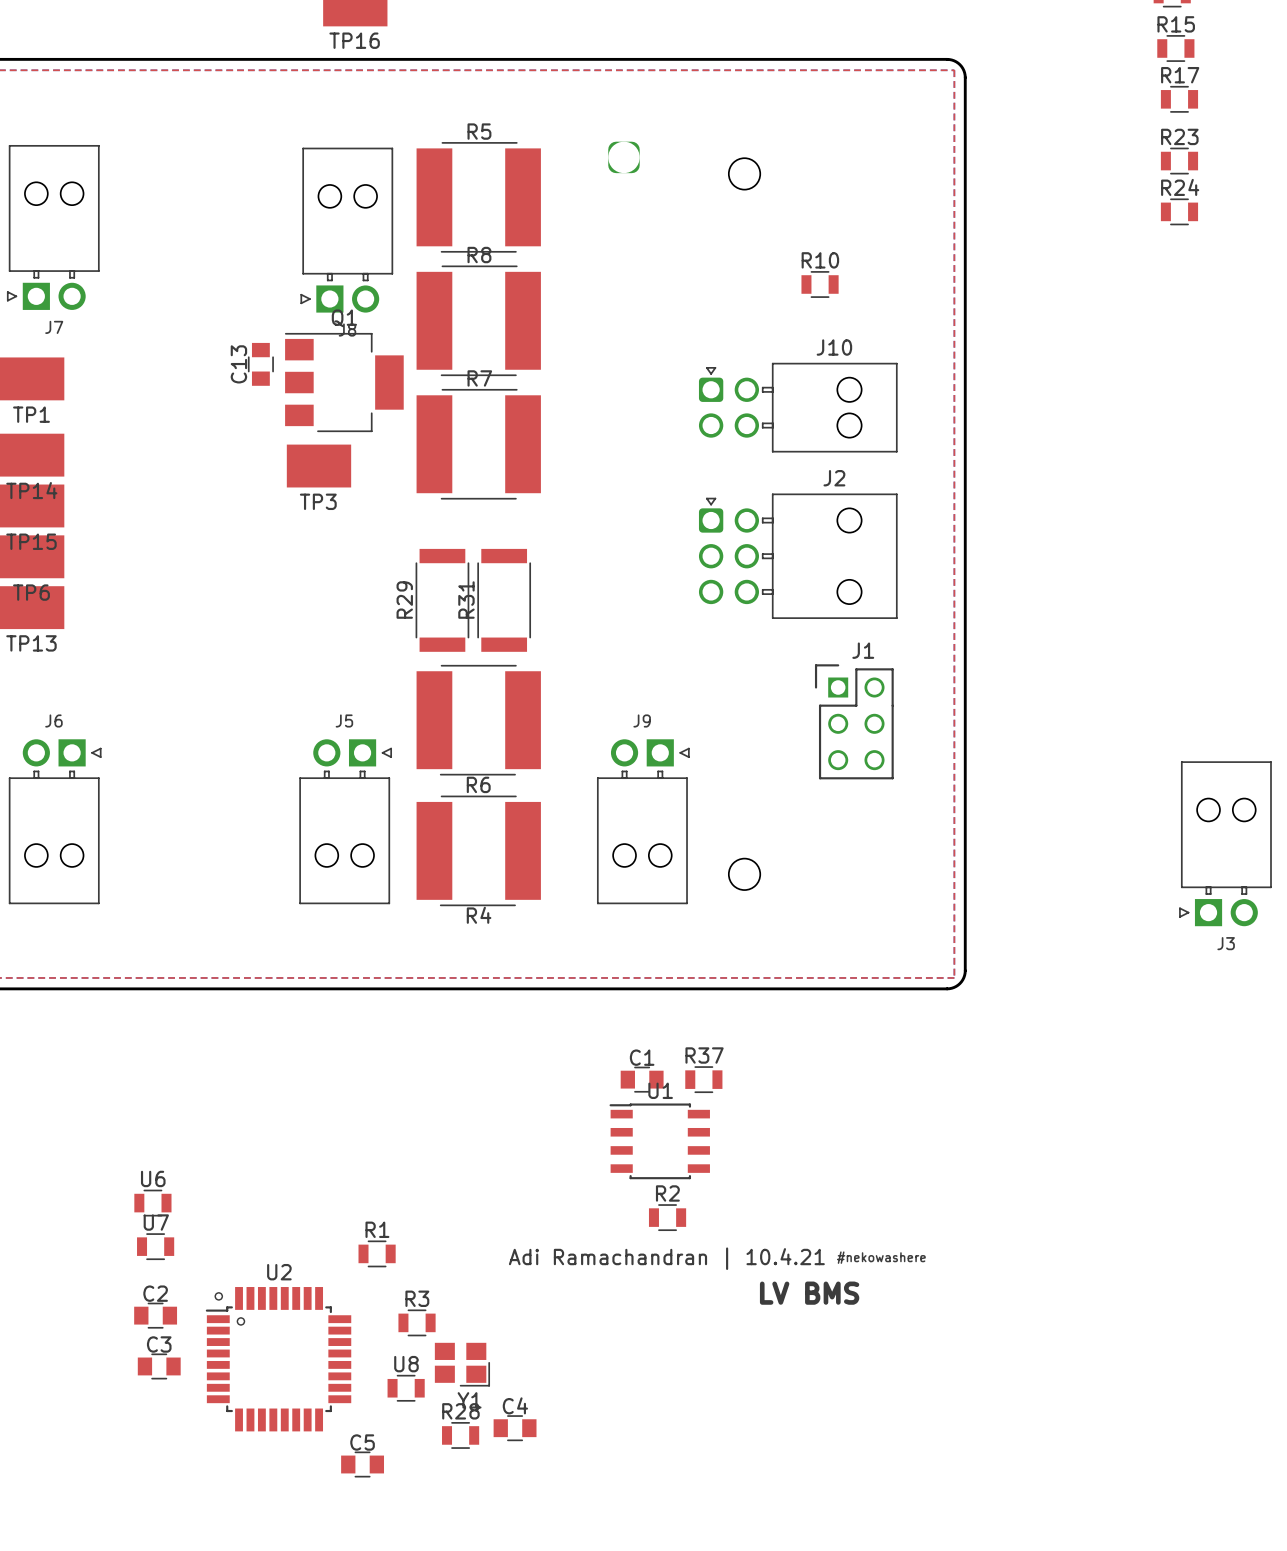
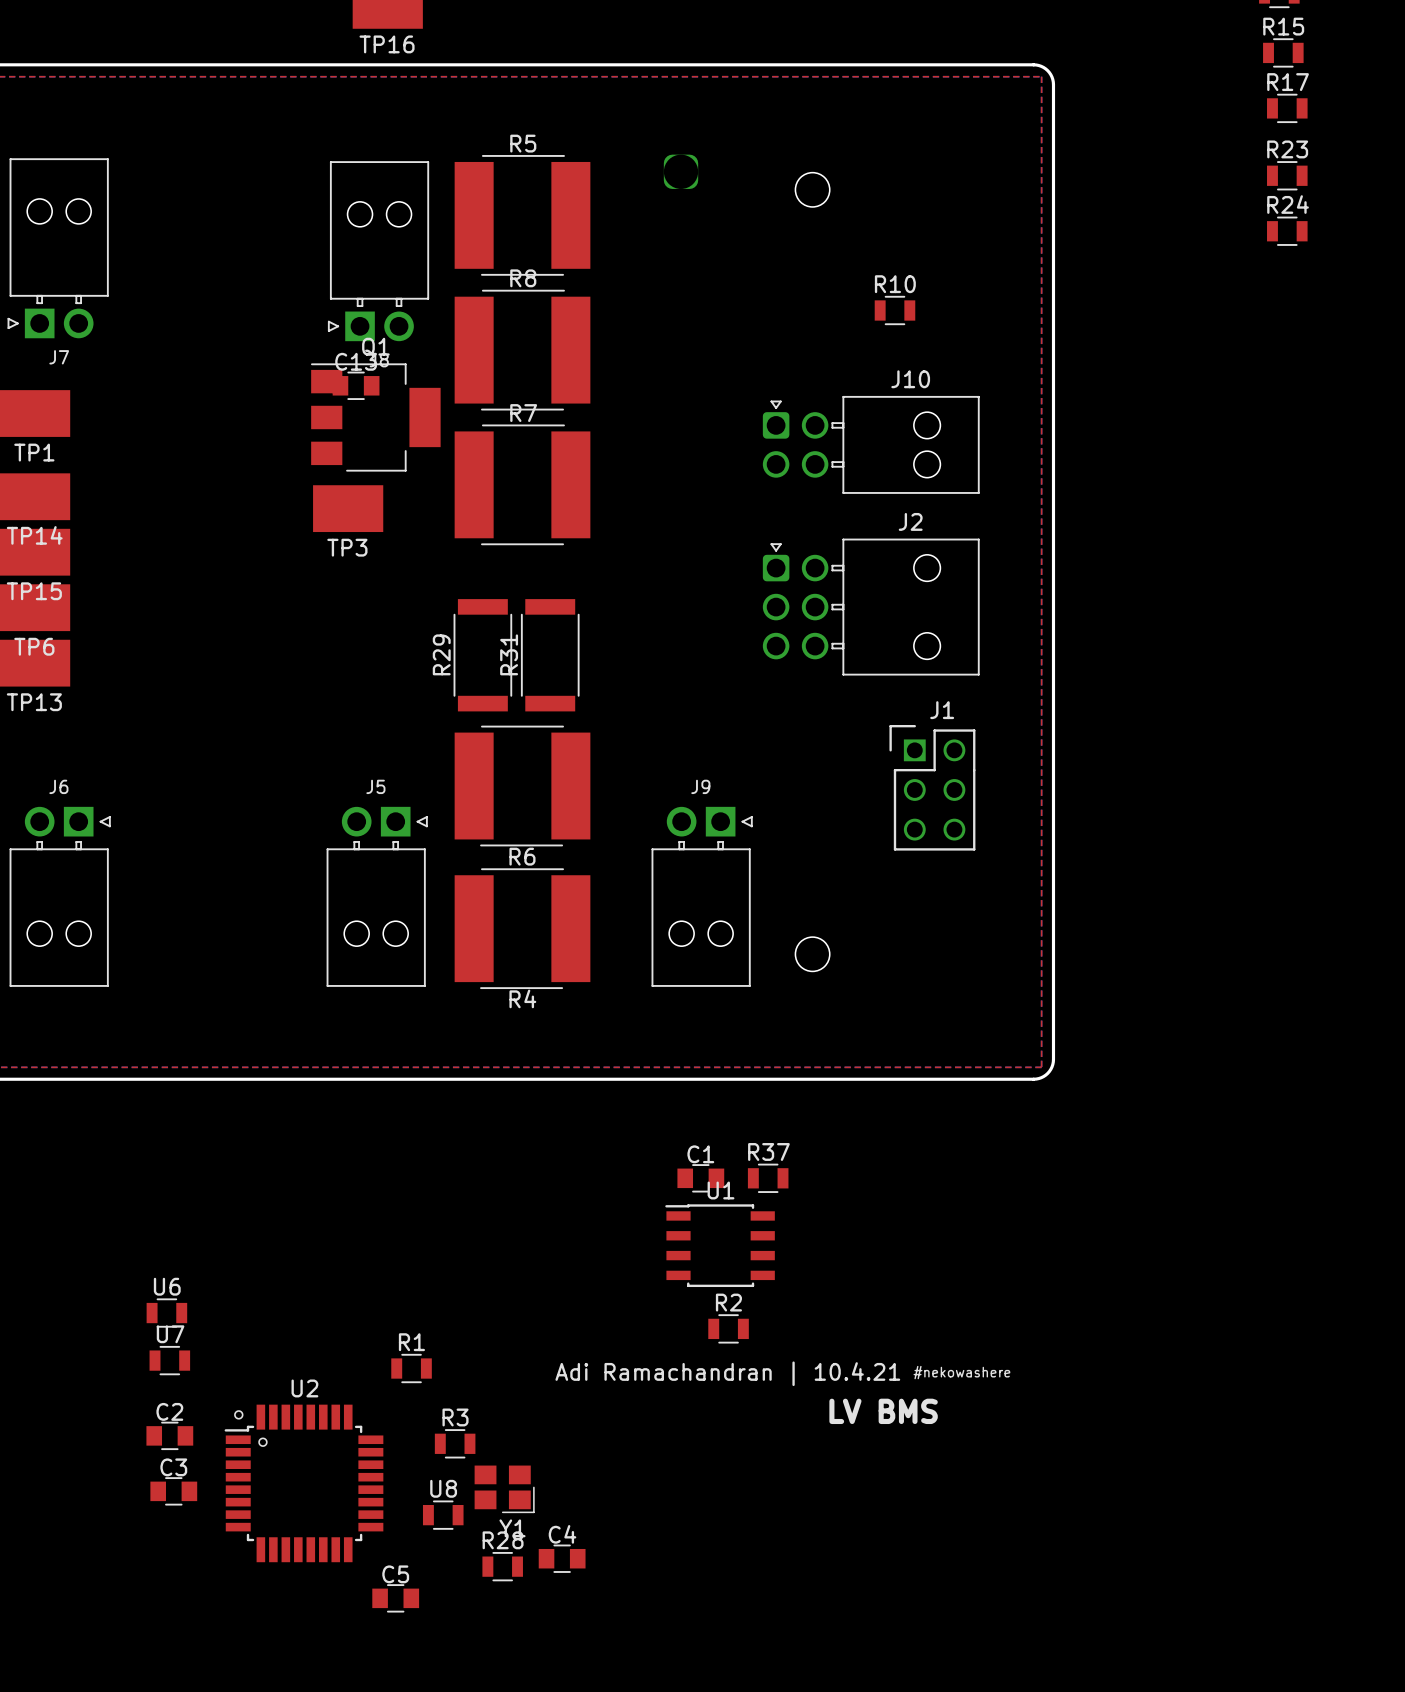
C13 rotation: 0° (260, 364) -> 90° clockwise (356, 385)
C13 position: (260, 364) -> (356, 385)
J3: (1225, 843) -> none

